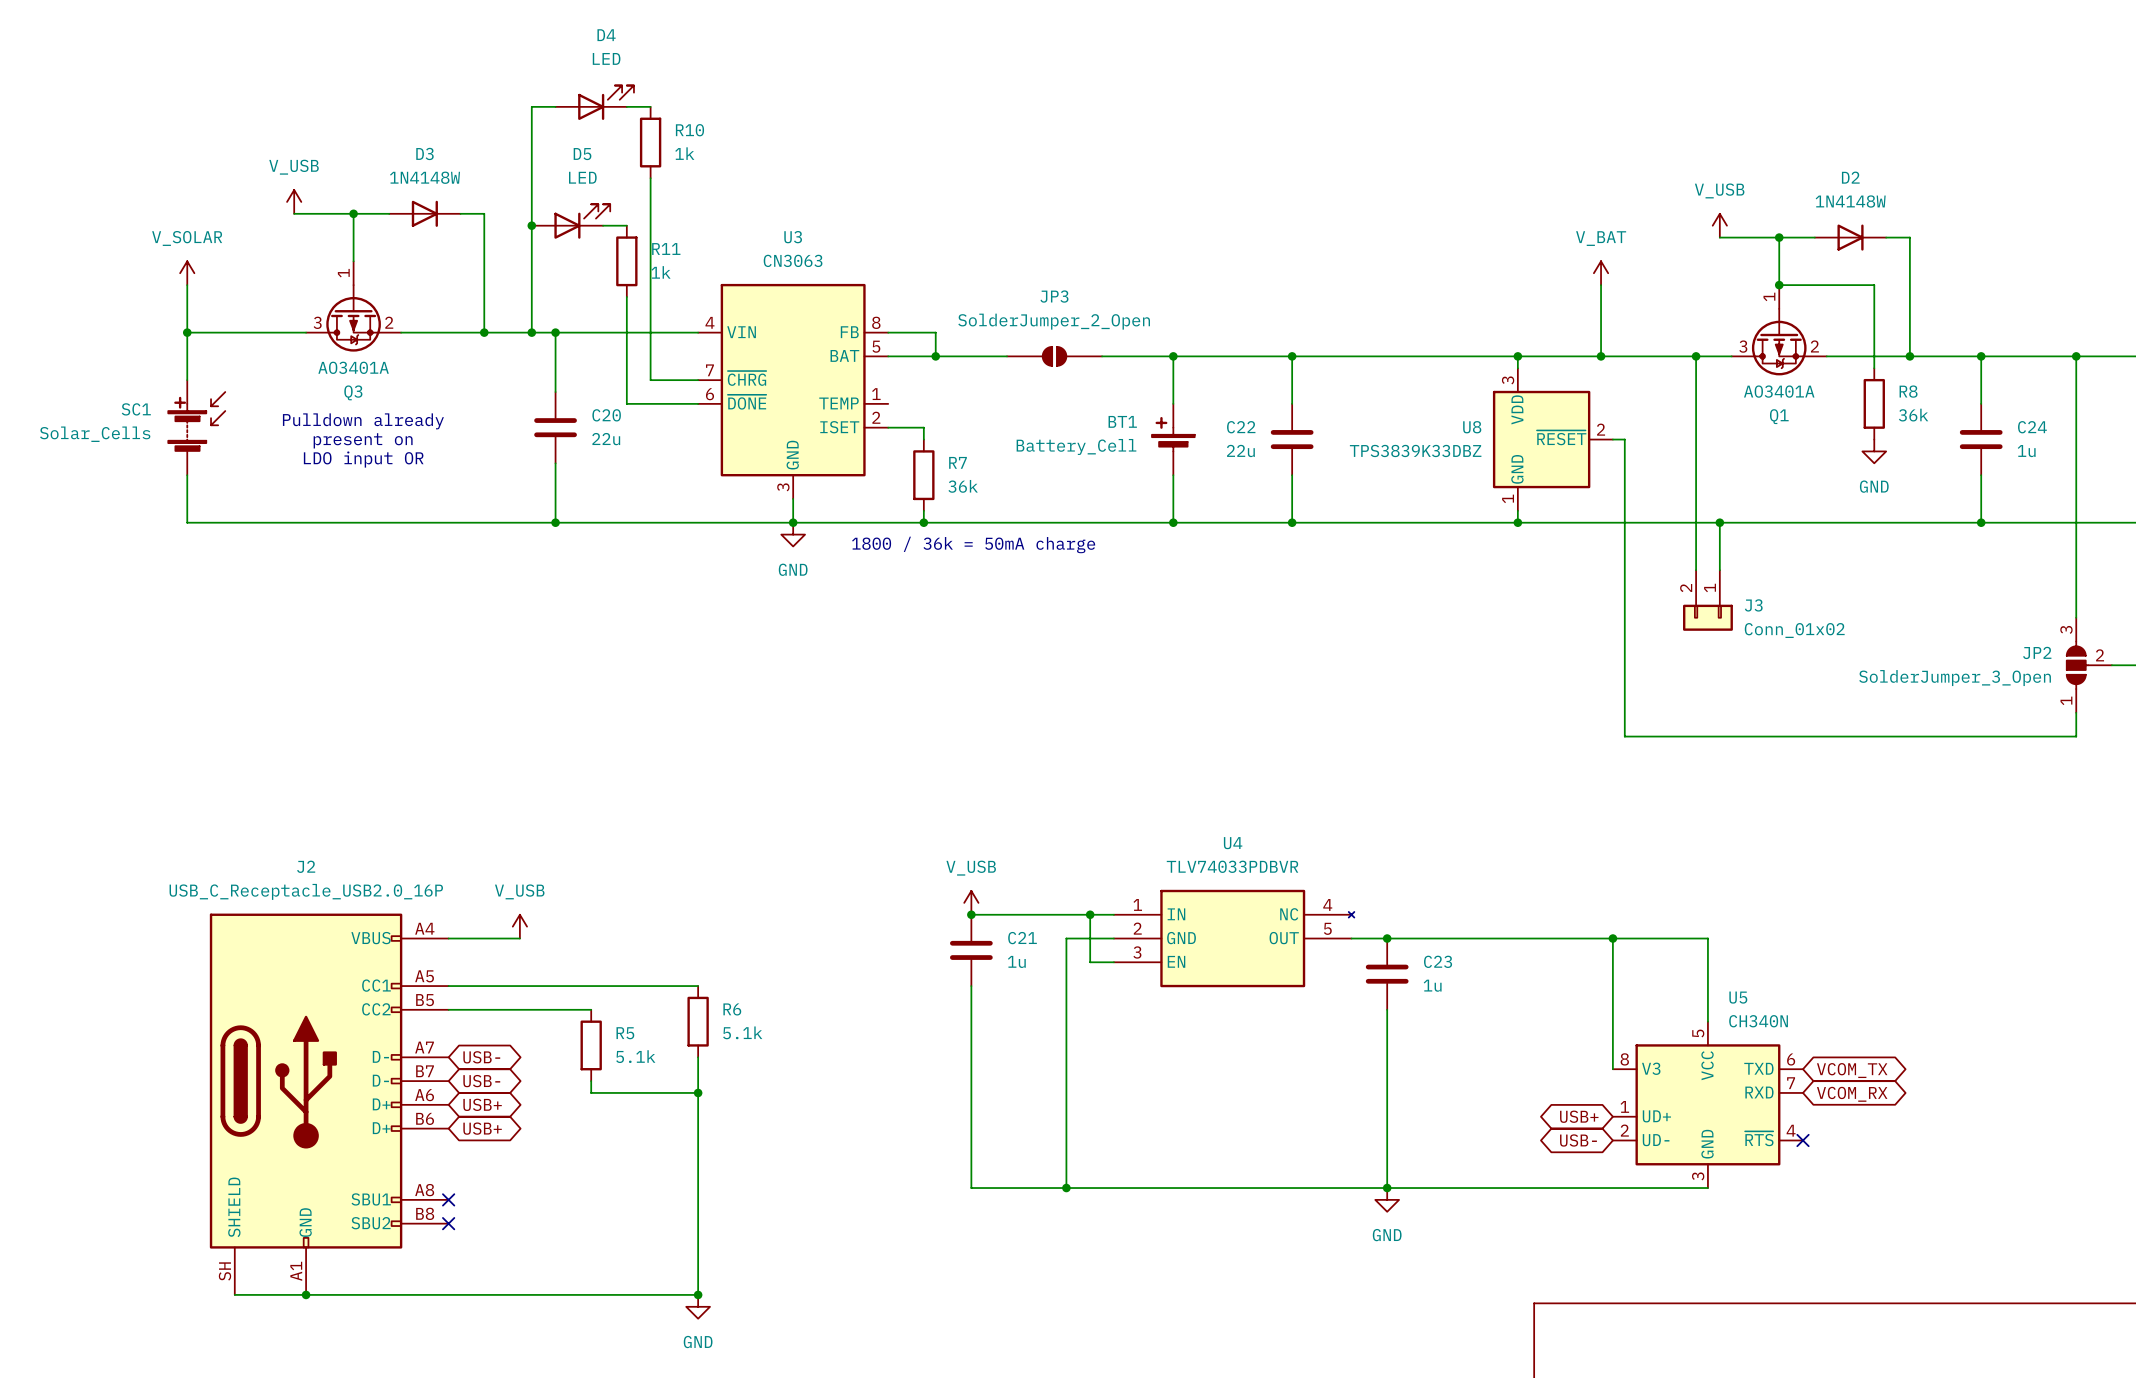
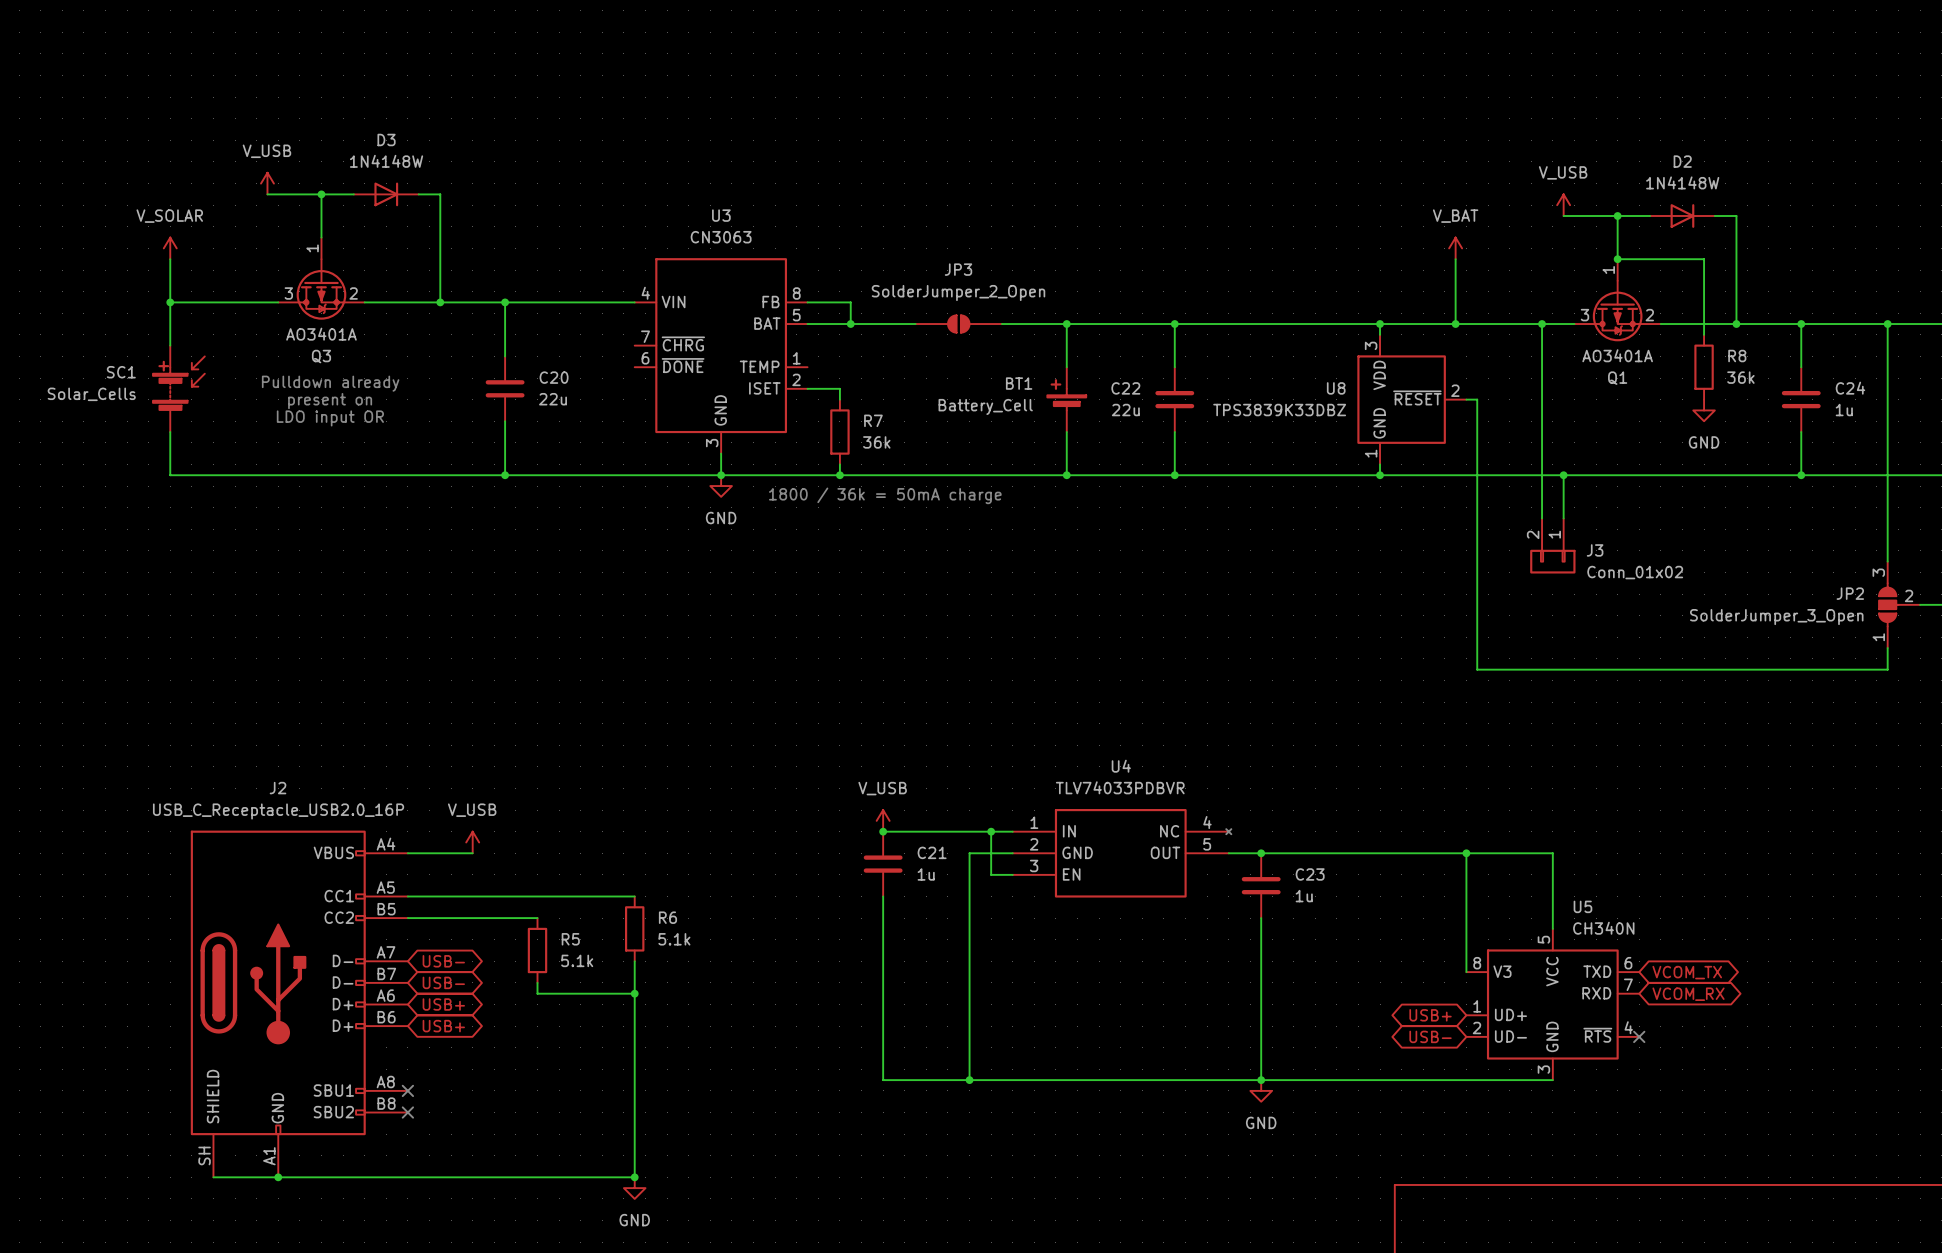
D4: LED (594, 102) -> none
wire: (555, 106) (531, 106) (531, 332) -> none
wire: (626, 106) (650, 106) -> none
R10: 1k (650, 142) -> none
wire: (650, 178) (650, 380) (698, 380) -> none
D5: LED (571, 221) -> none
junction: (531, 225) -> none
wire: (603, 225) (626, 225) -> none
R11: 1k (626, 261) -> none
wire: (626, 296) (626, 403) (698, 403) -> none
junction: (531, 332) -> none

